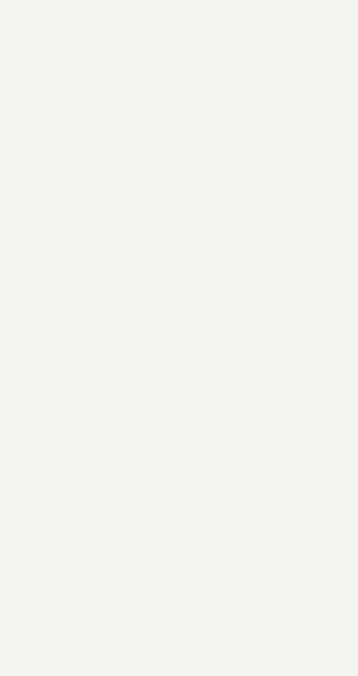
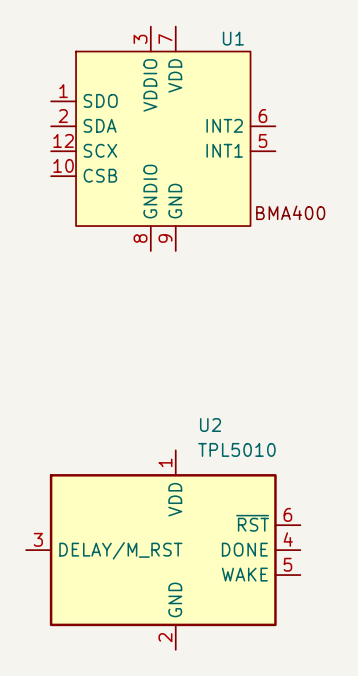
U1: none -> (163, 138)
U2: none -> TPL5010 (163, 550)

